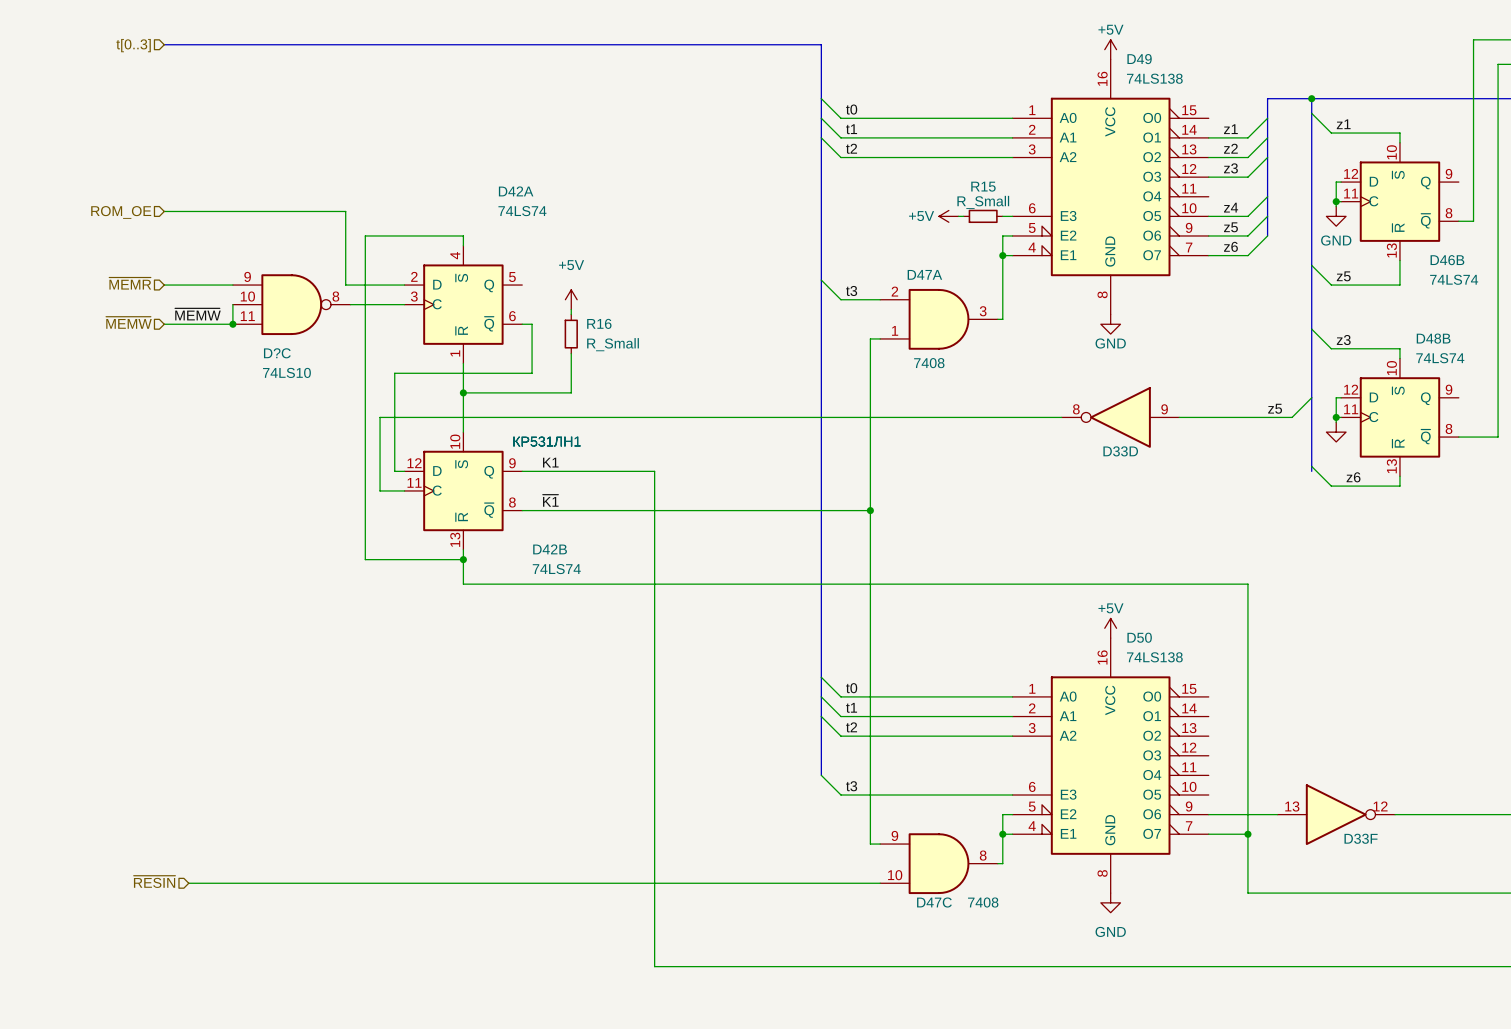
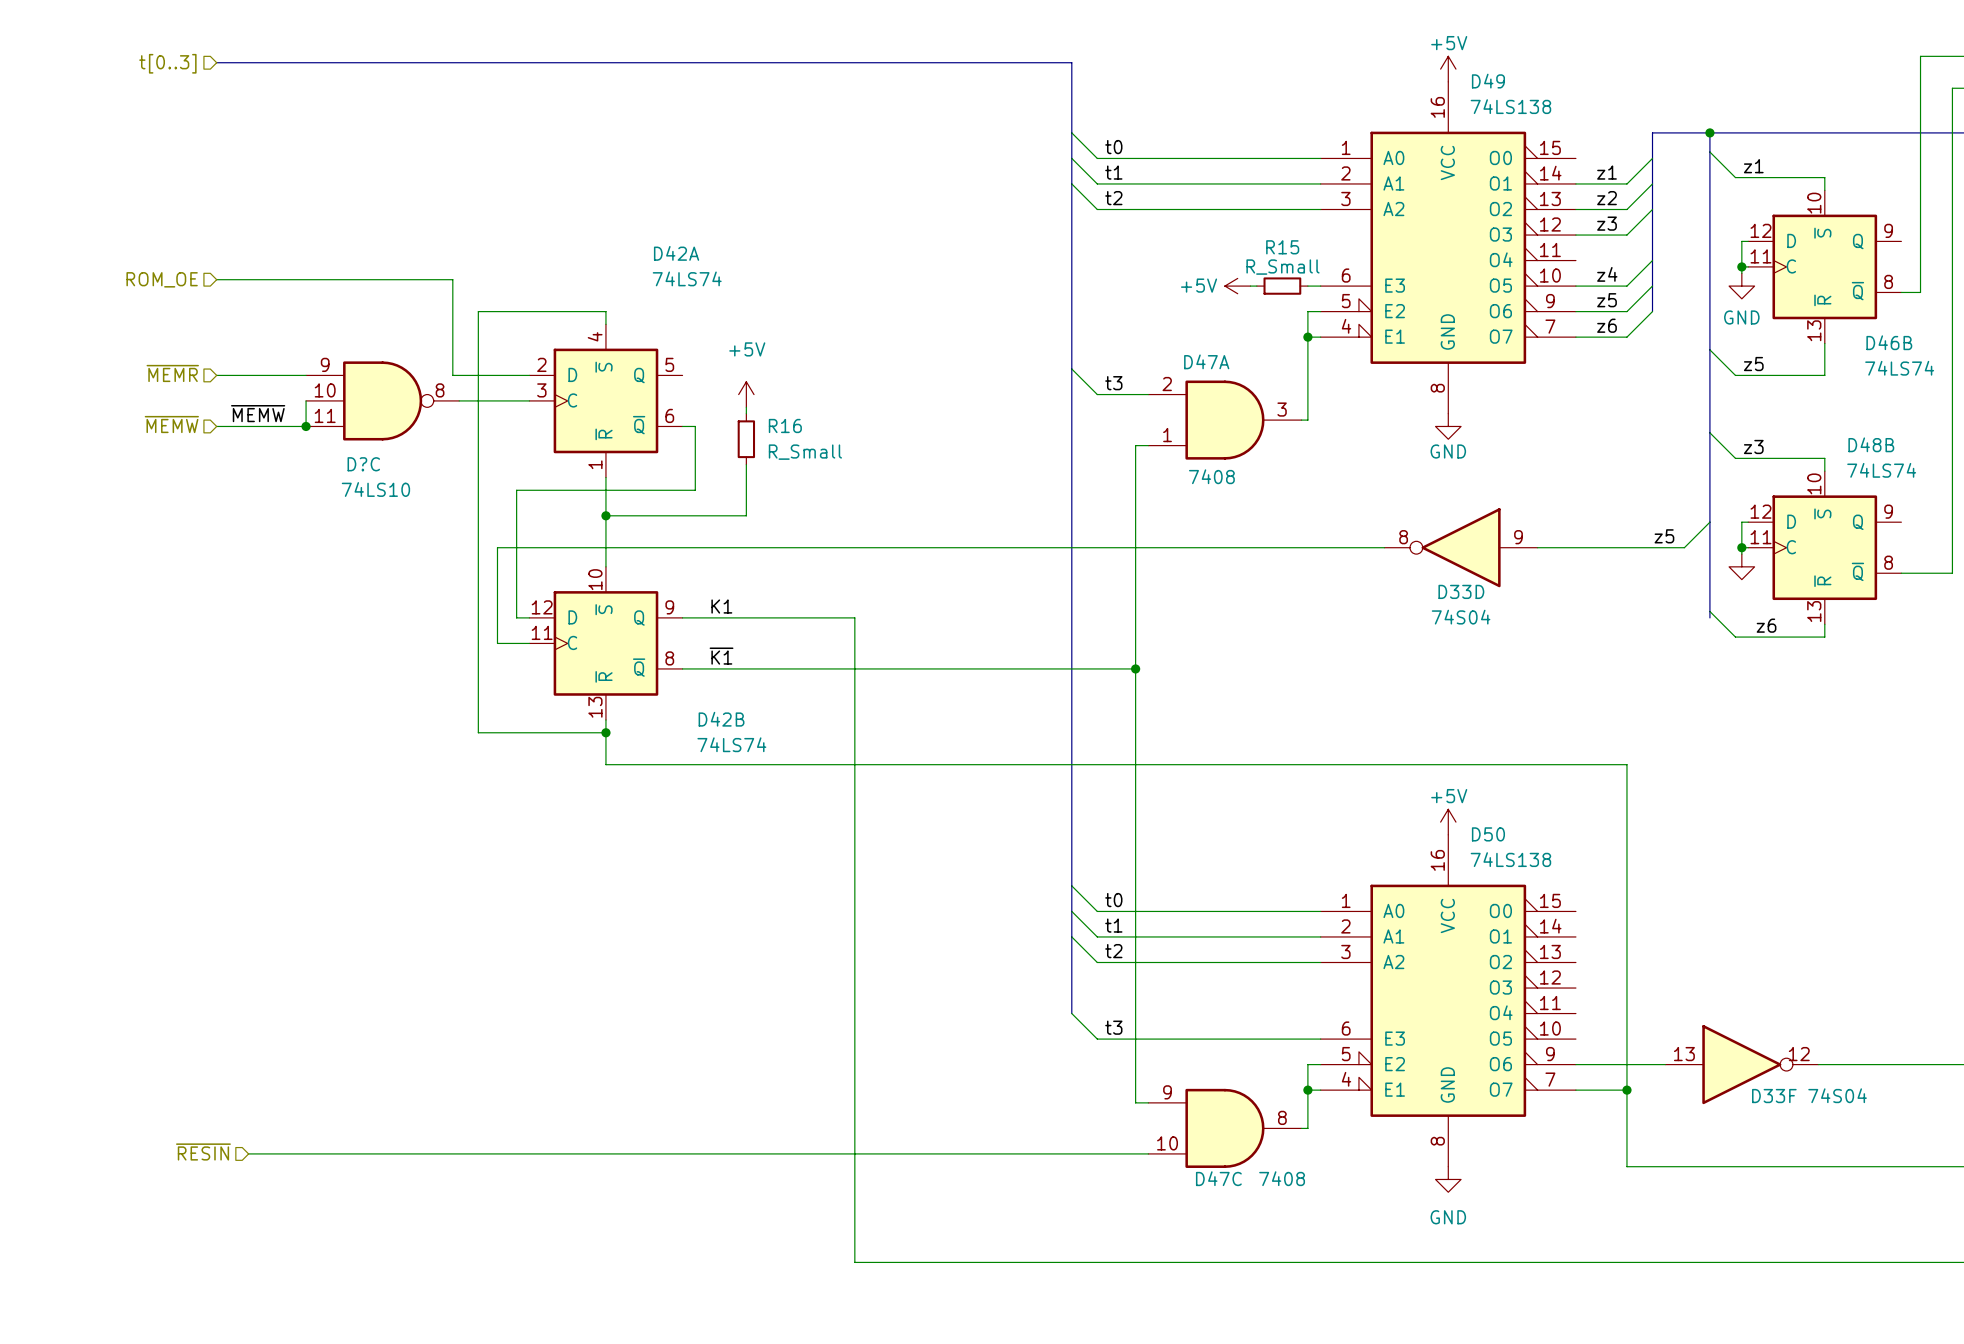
D33D text: КР531ЛН1 (546, 441) -> none
D33F text: КР531ЛН1 (546, 441) -> none
D33D value: none -> 74S04 (1461, 617)
D33F value: none -> 74S04 (1837, 1095)

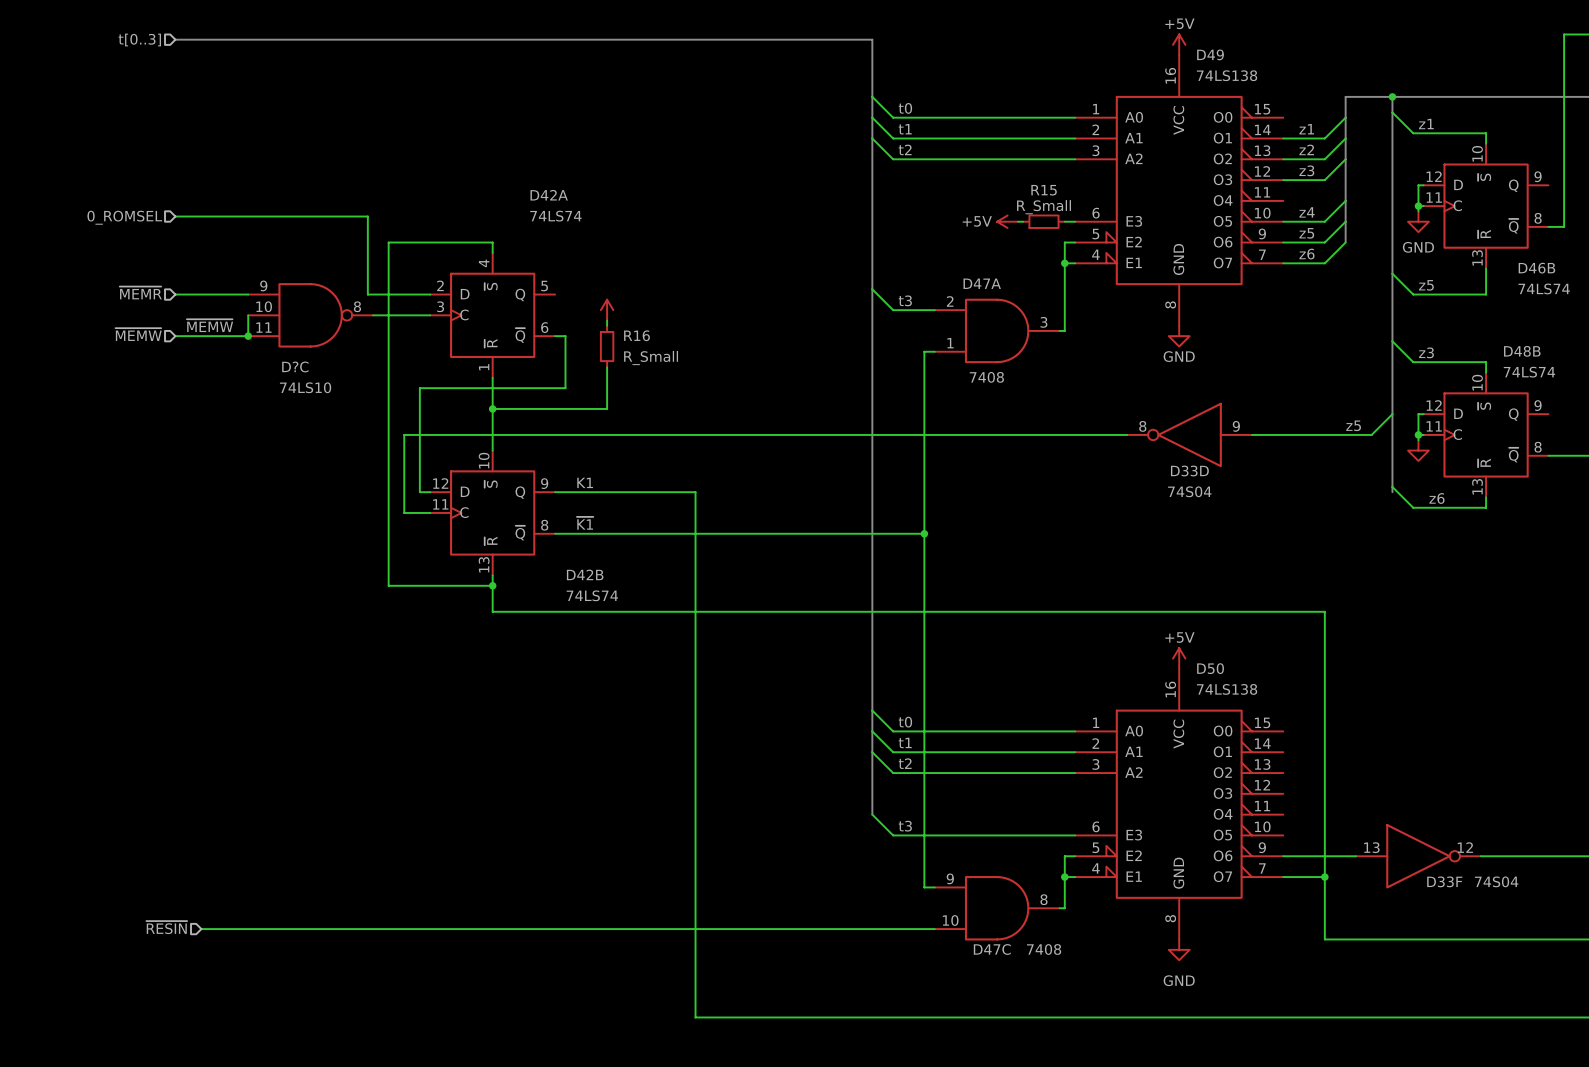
hierarchical label: ROM_OE (162, 279) -> 0_ROMSEL (124, 217)
power symbol text: +5V (747, 349) -> none

